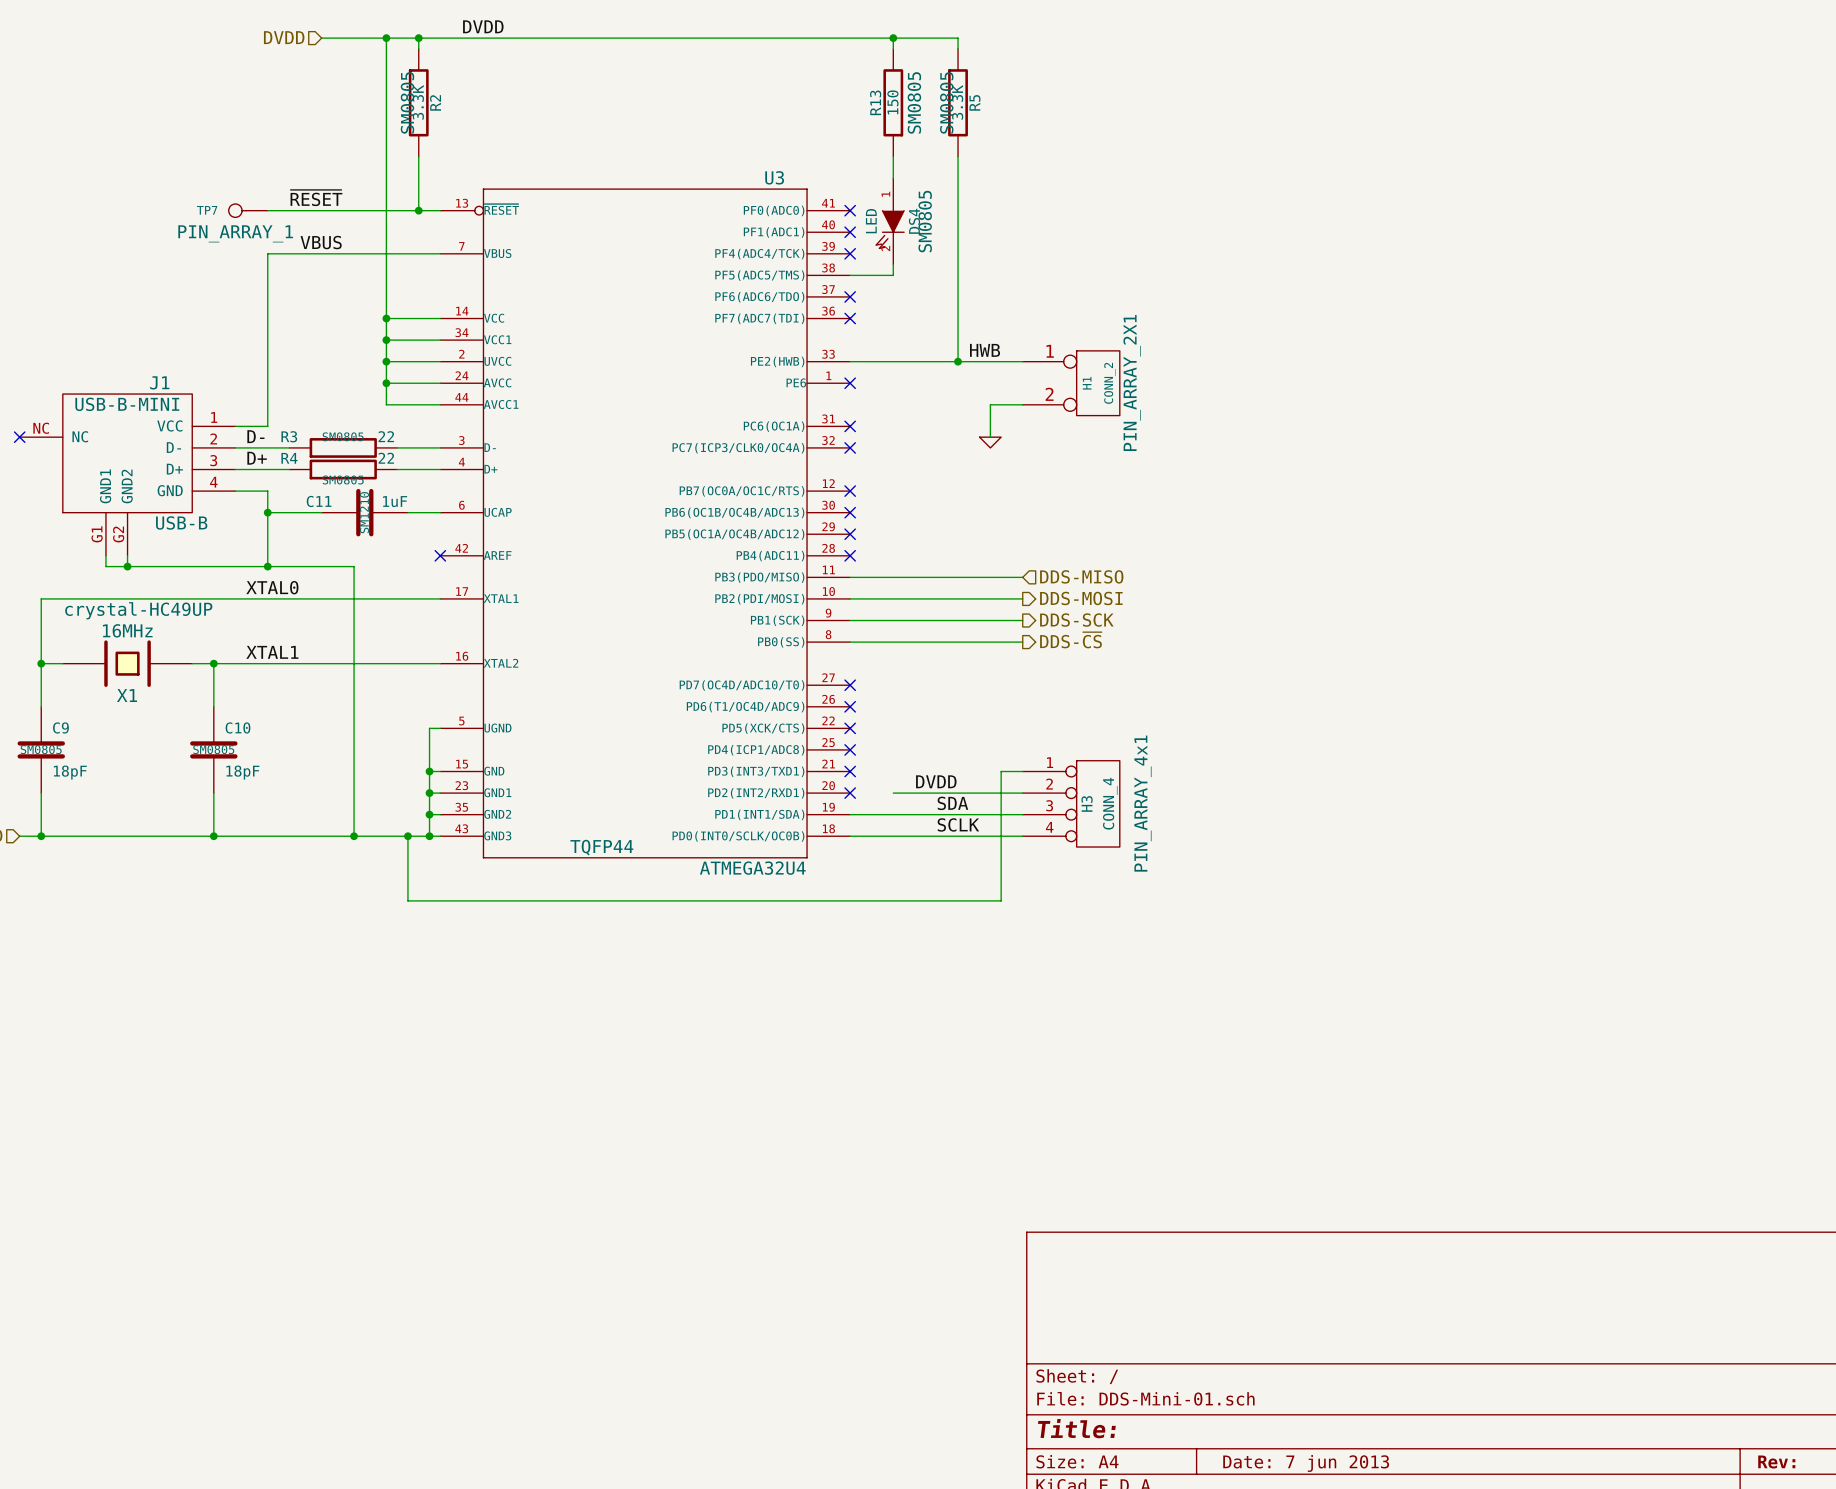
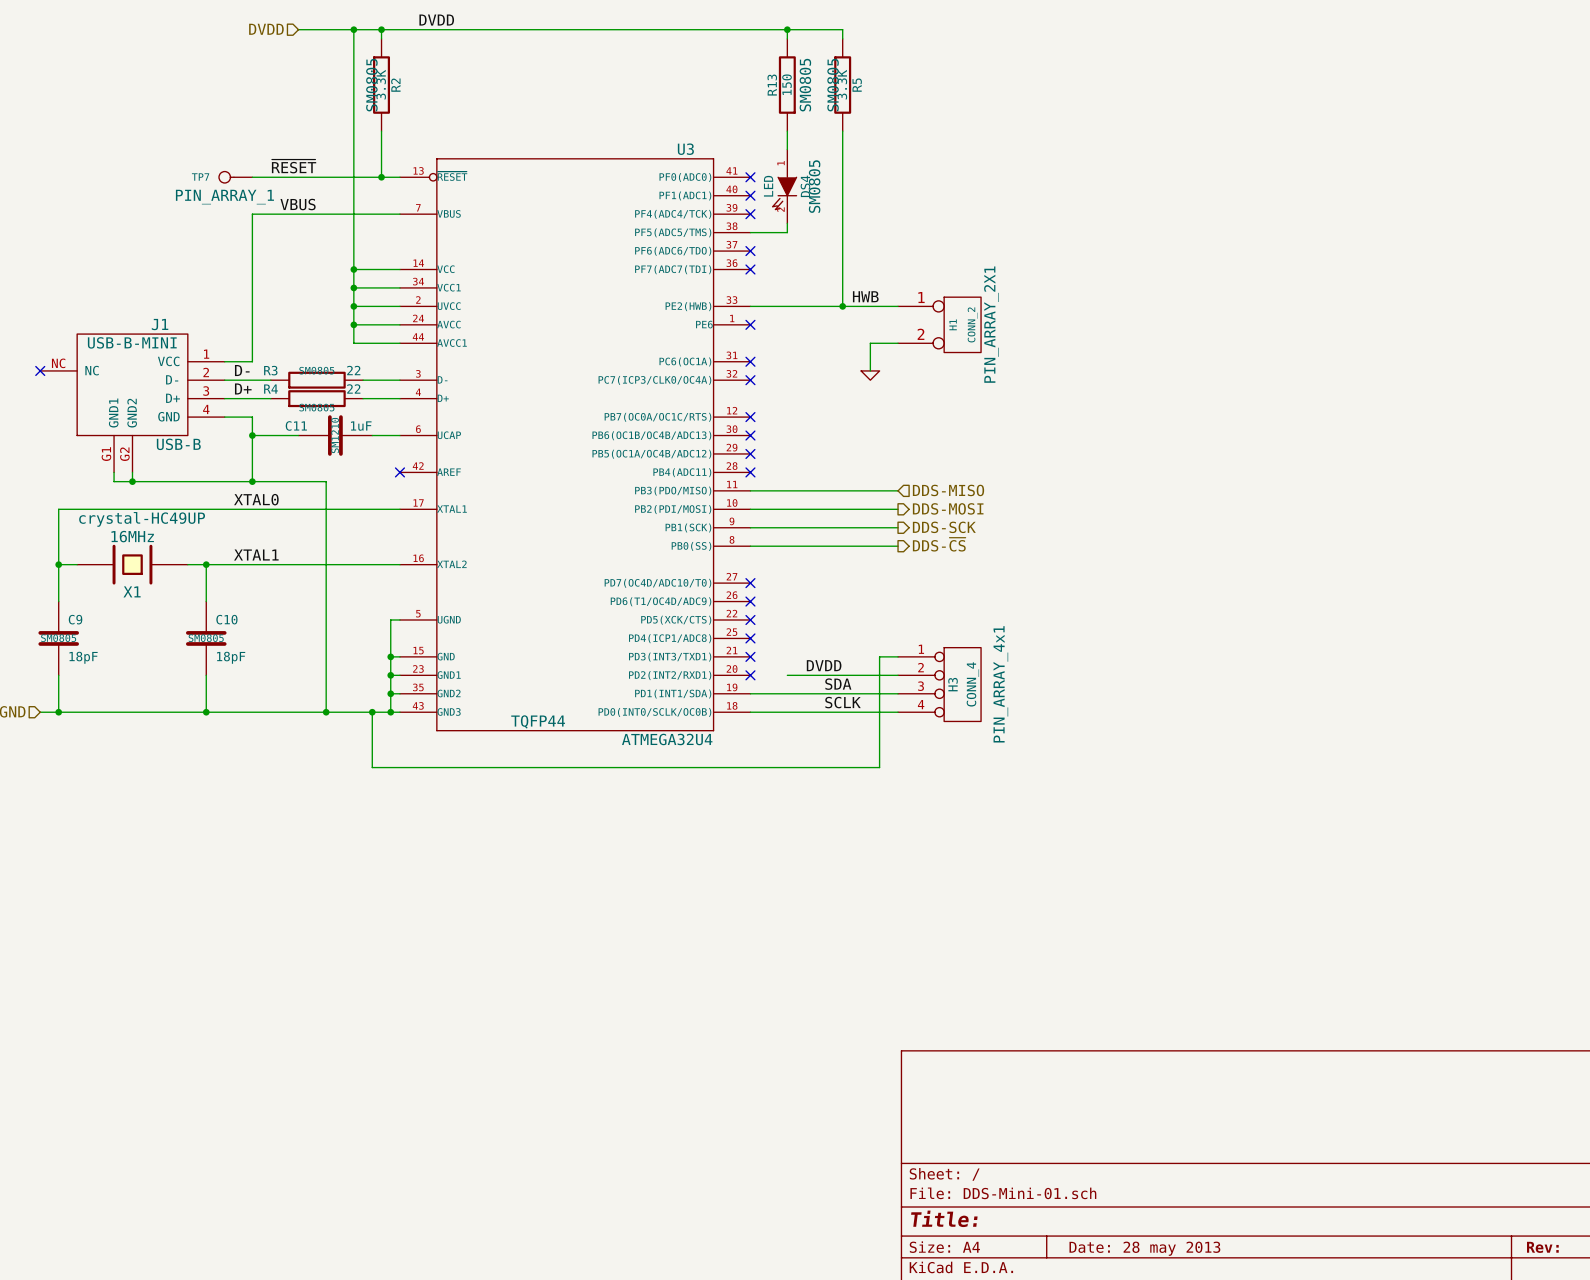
title block: Date: 7 jun 2013 (1306, 1463) -> Date: 28 may 2013 (1144, 1248)

